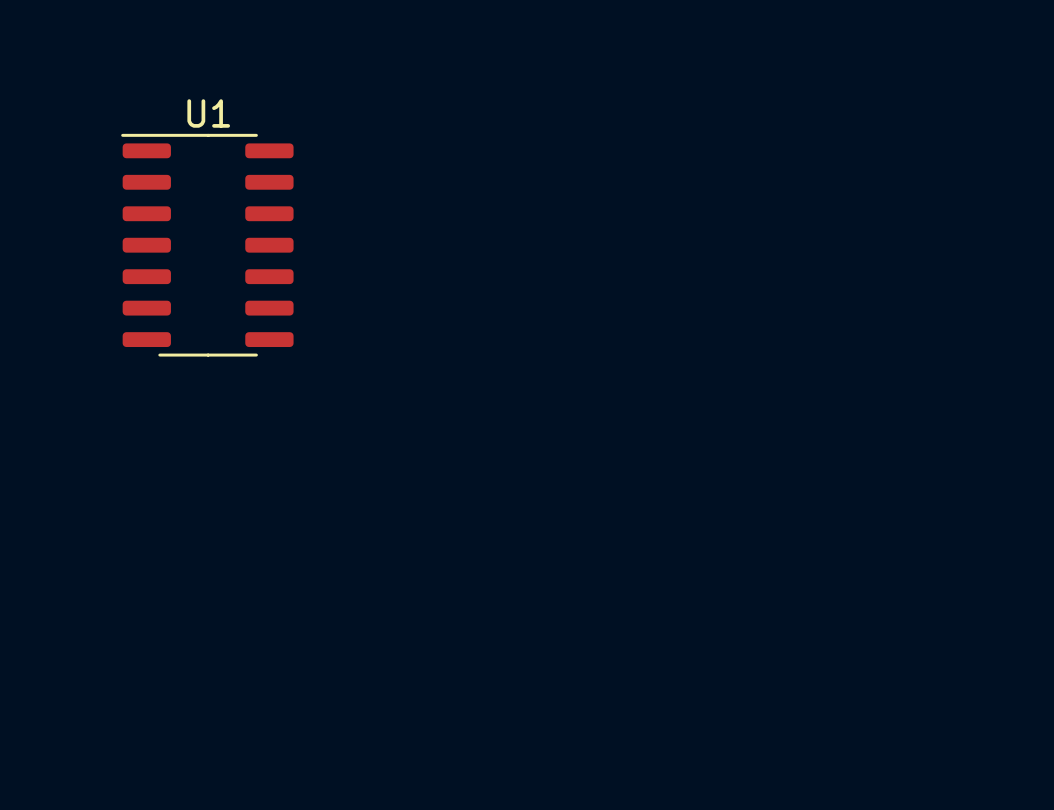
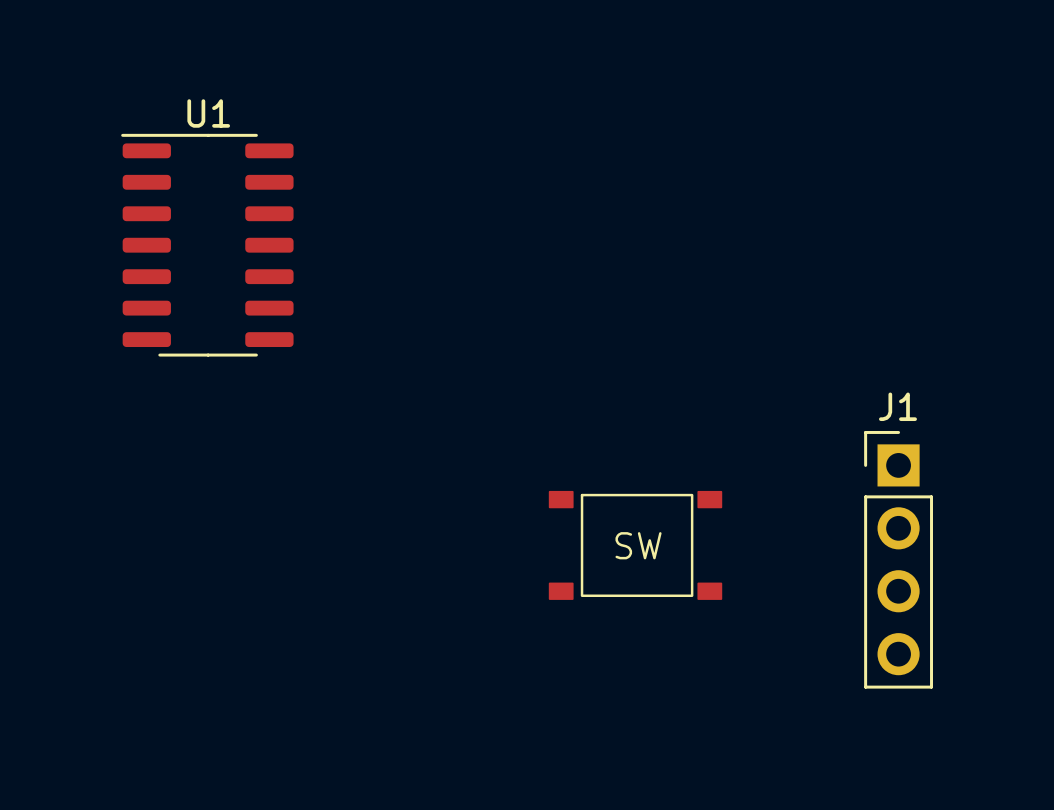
part: none -> (635, 545)
J1: none -> (898, 559)

